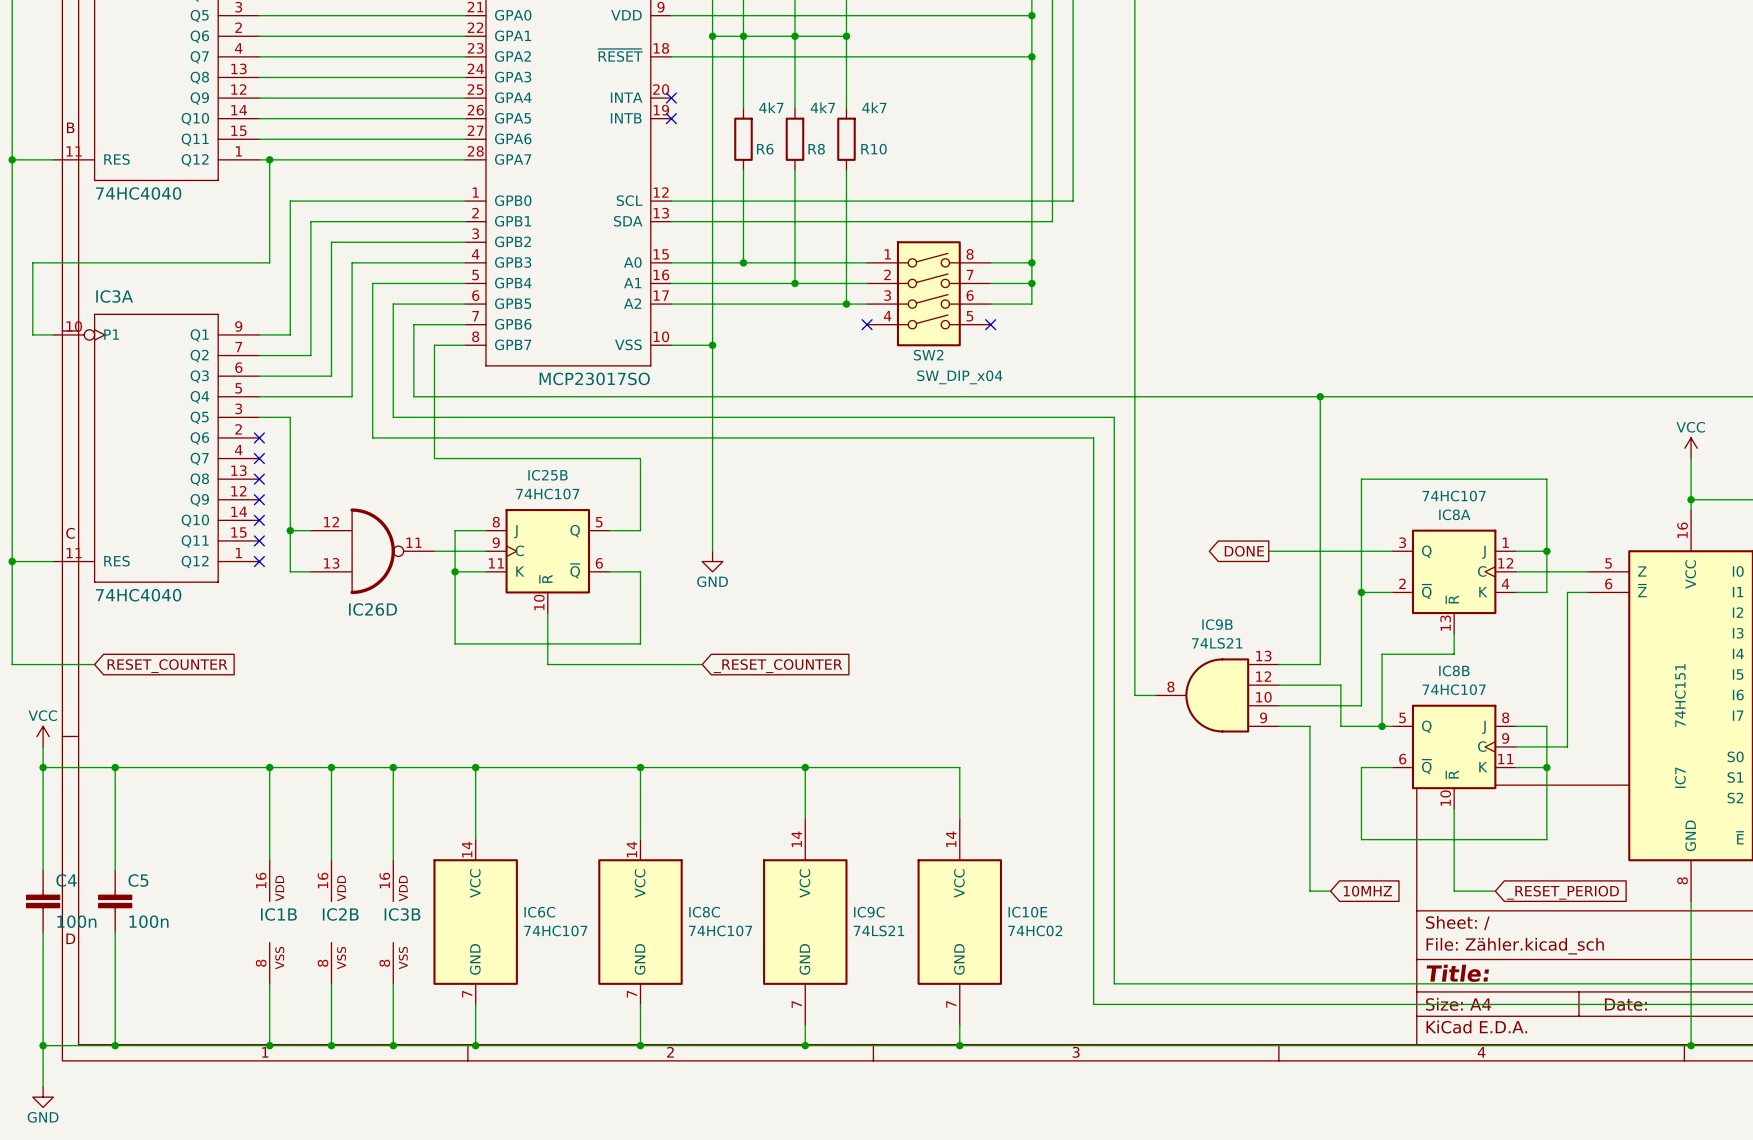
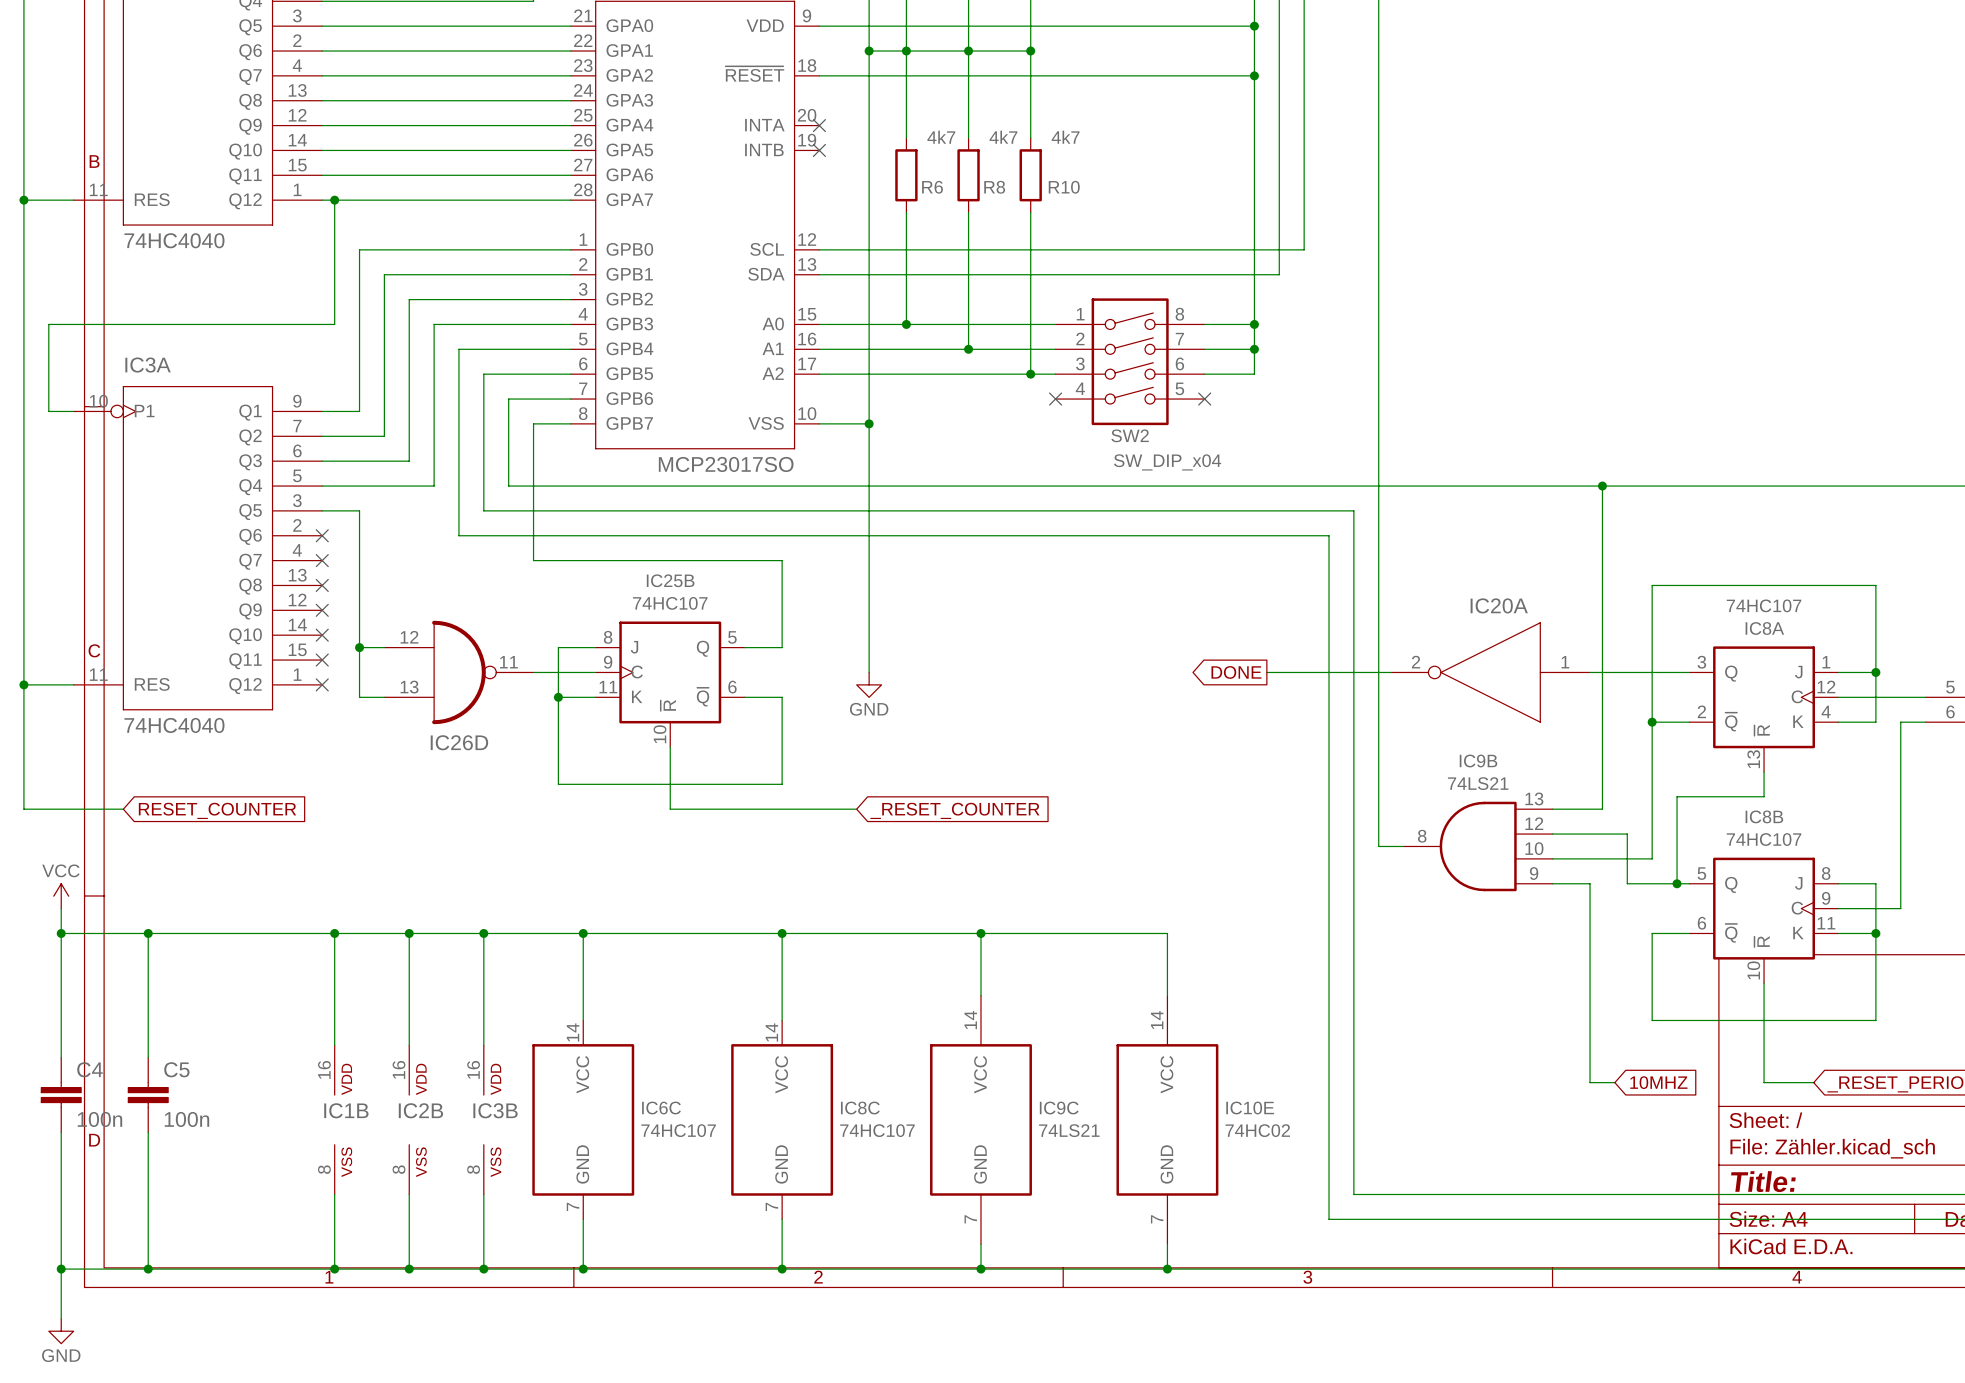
global label: none -> DONE (1236, 672)
wire: none -> (1266, 672) (1391, 672)
IC20A: none -> (1490, 672)
global label: DONE (1244, 551) -> none

